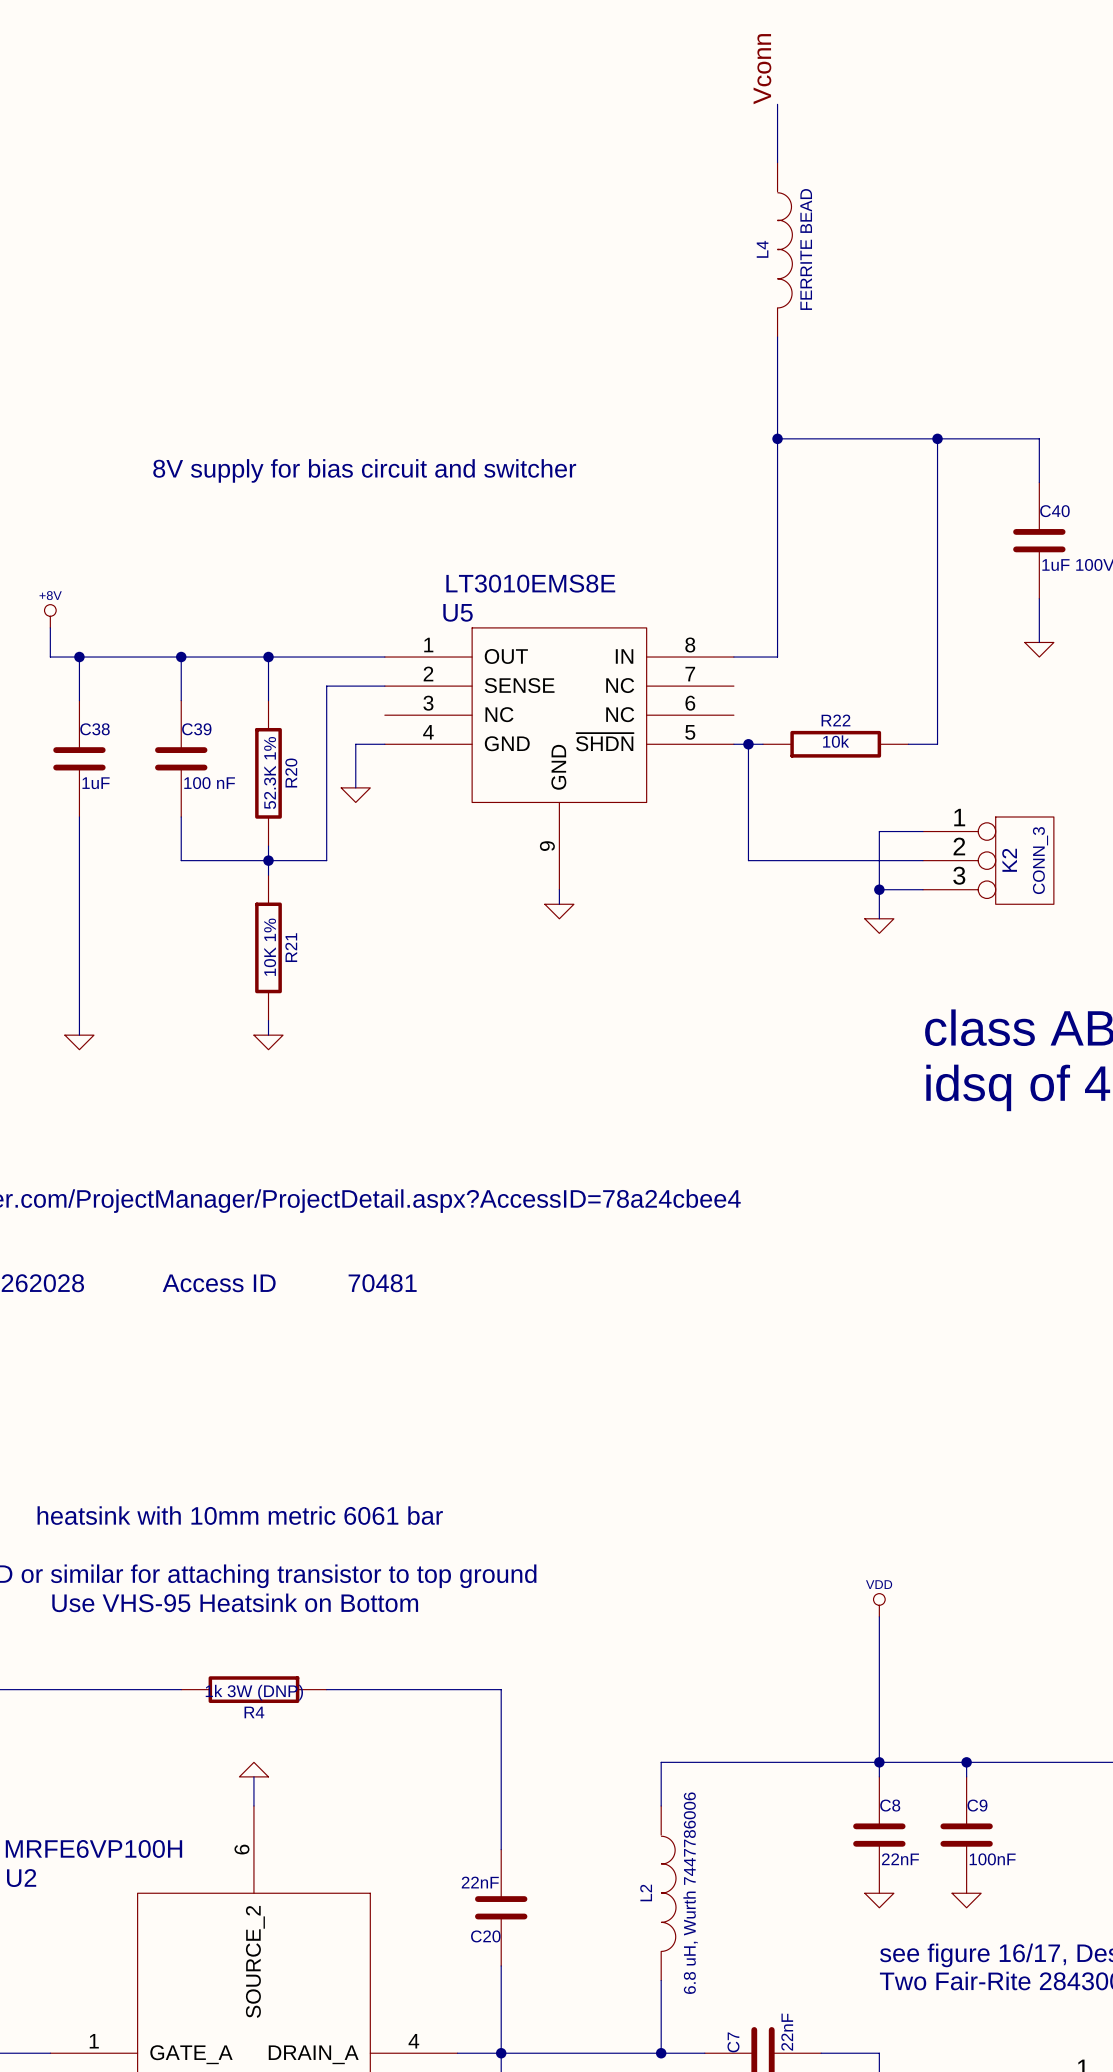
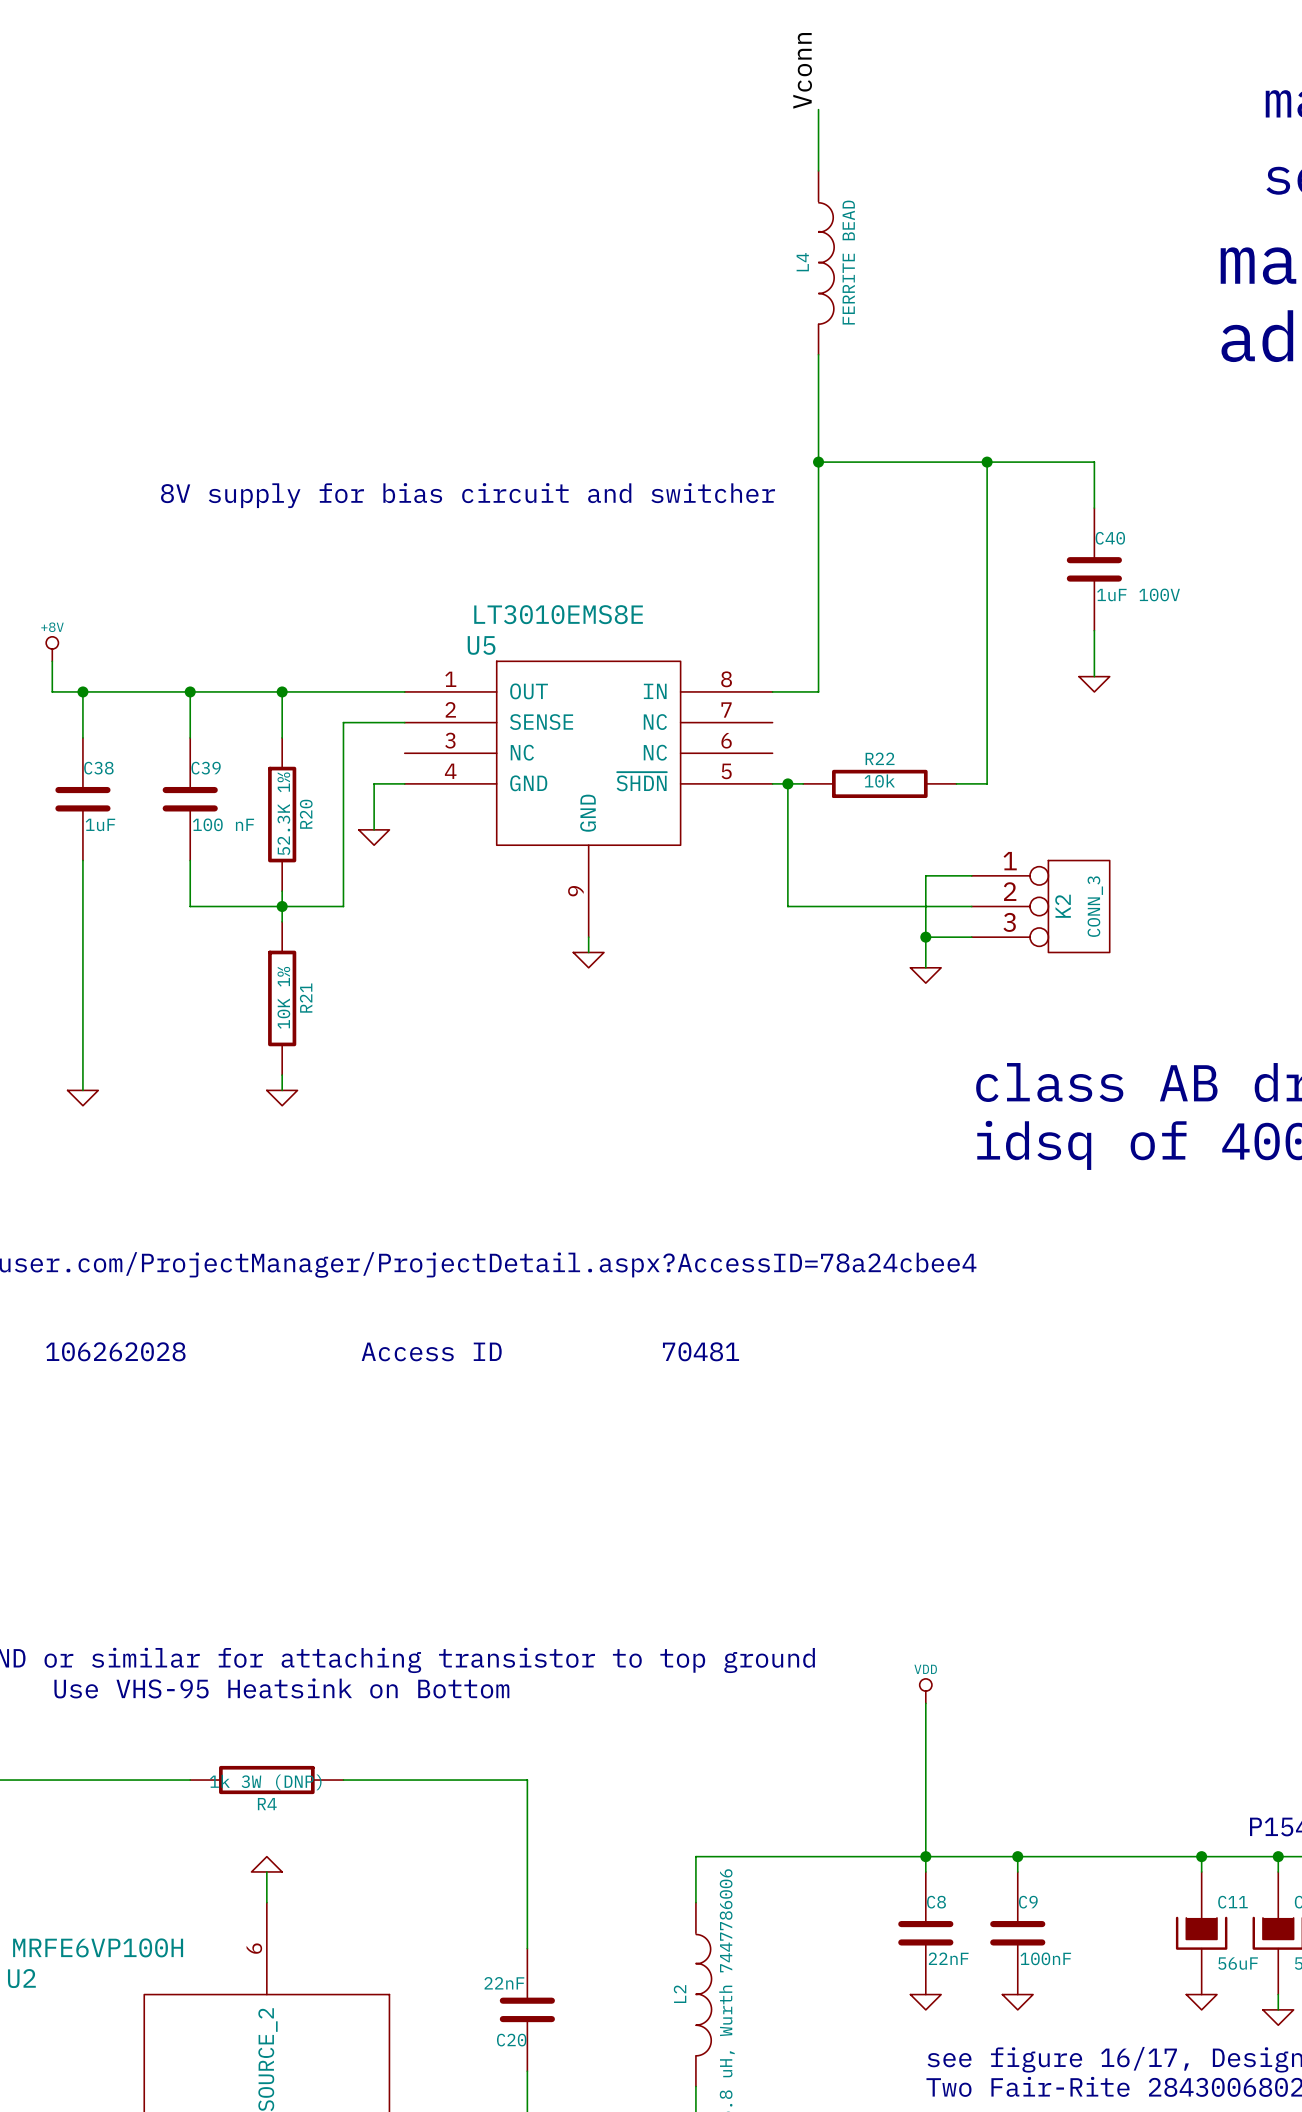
text: heatsink with 10mm metric 6061 bar (240, 1515) -> none

